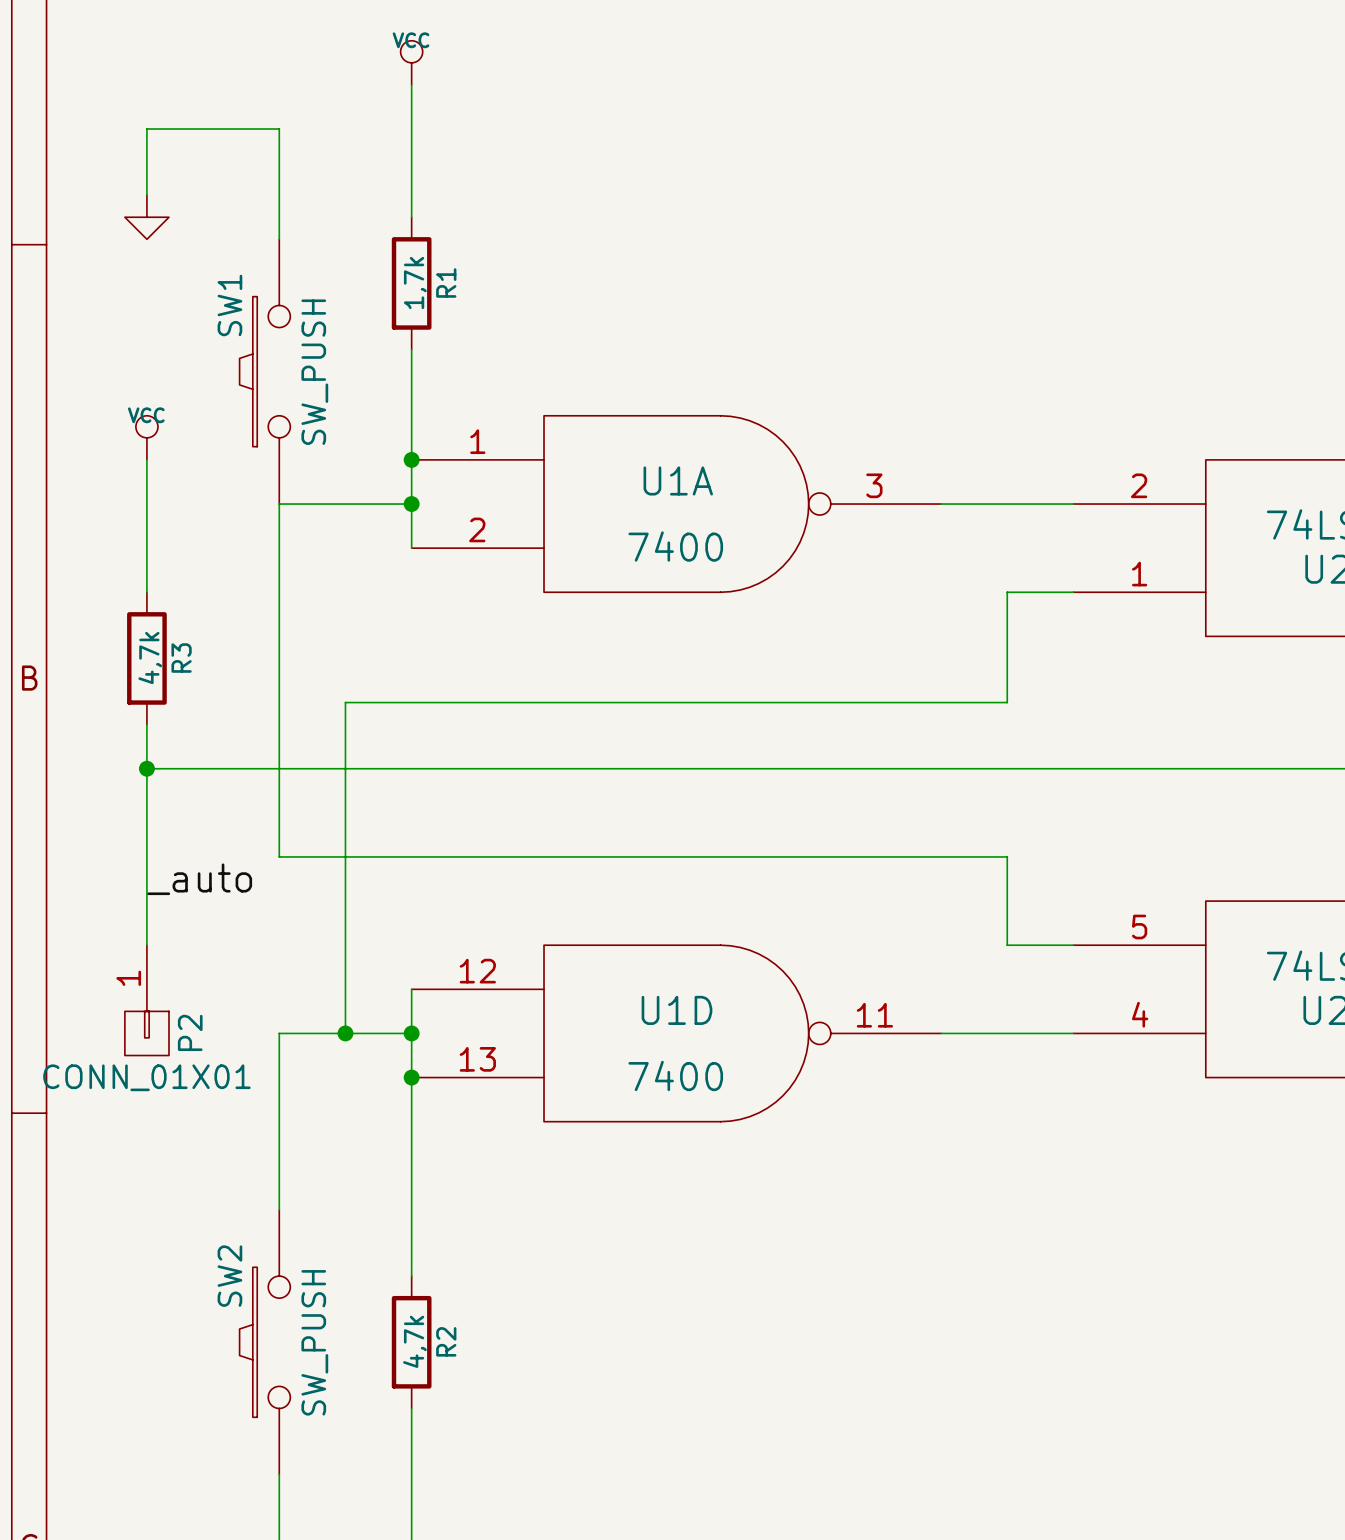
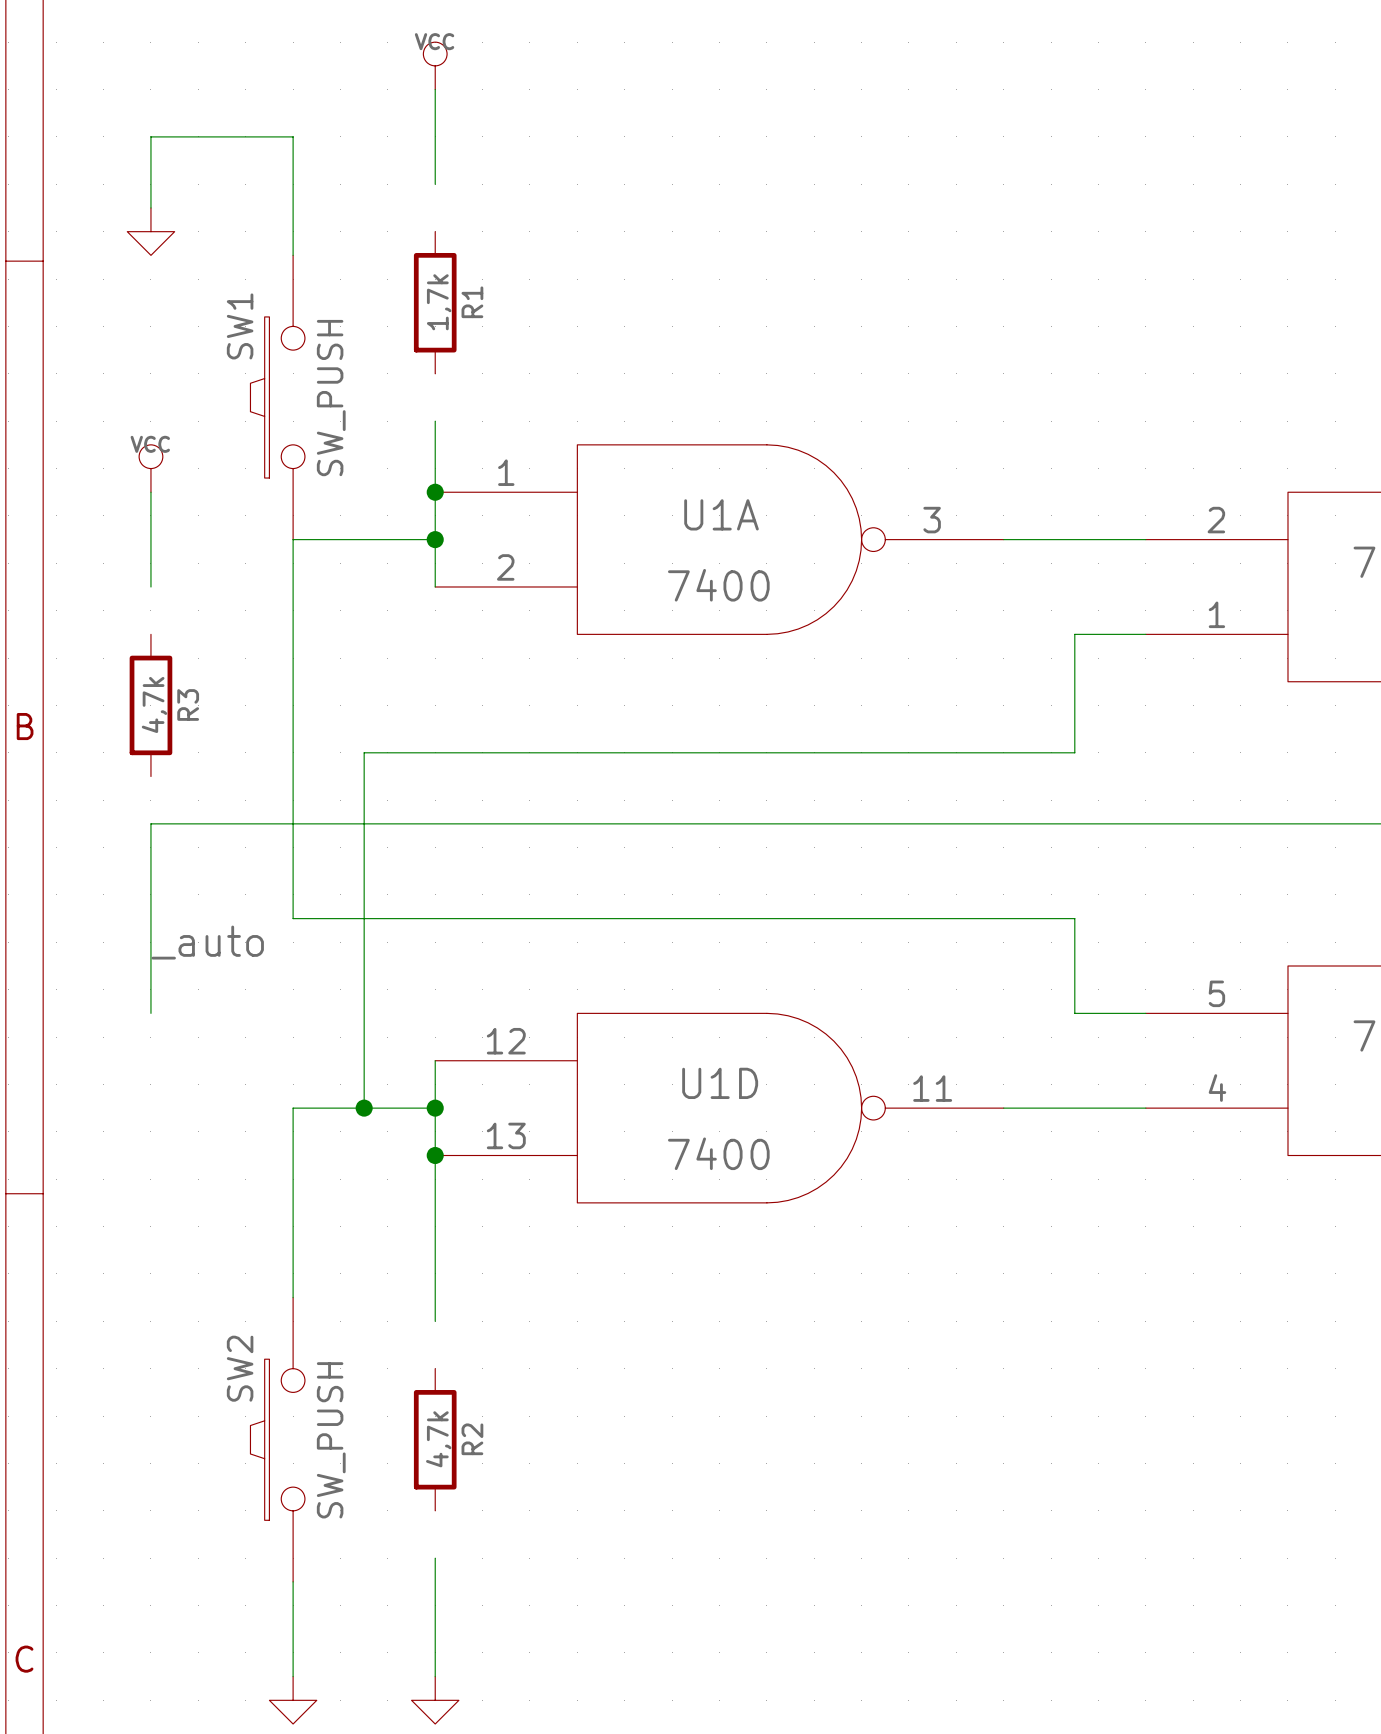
wire: (411, 173) (411, 217) -> none
wire: (411, 349) (411, 393) -> none
wire: (146, 548) (146, 592) -> none
wire: (146, 724) (146, 768) -> none
junction: (146, 768) -> none
P2: CONN_01X01 (146, 1000) -> none
wire: (411, 1231) (411, 1276) -> none
wire: (411, 1408) (411, 1452) -> none

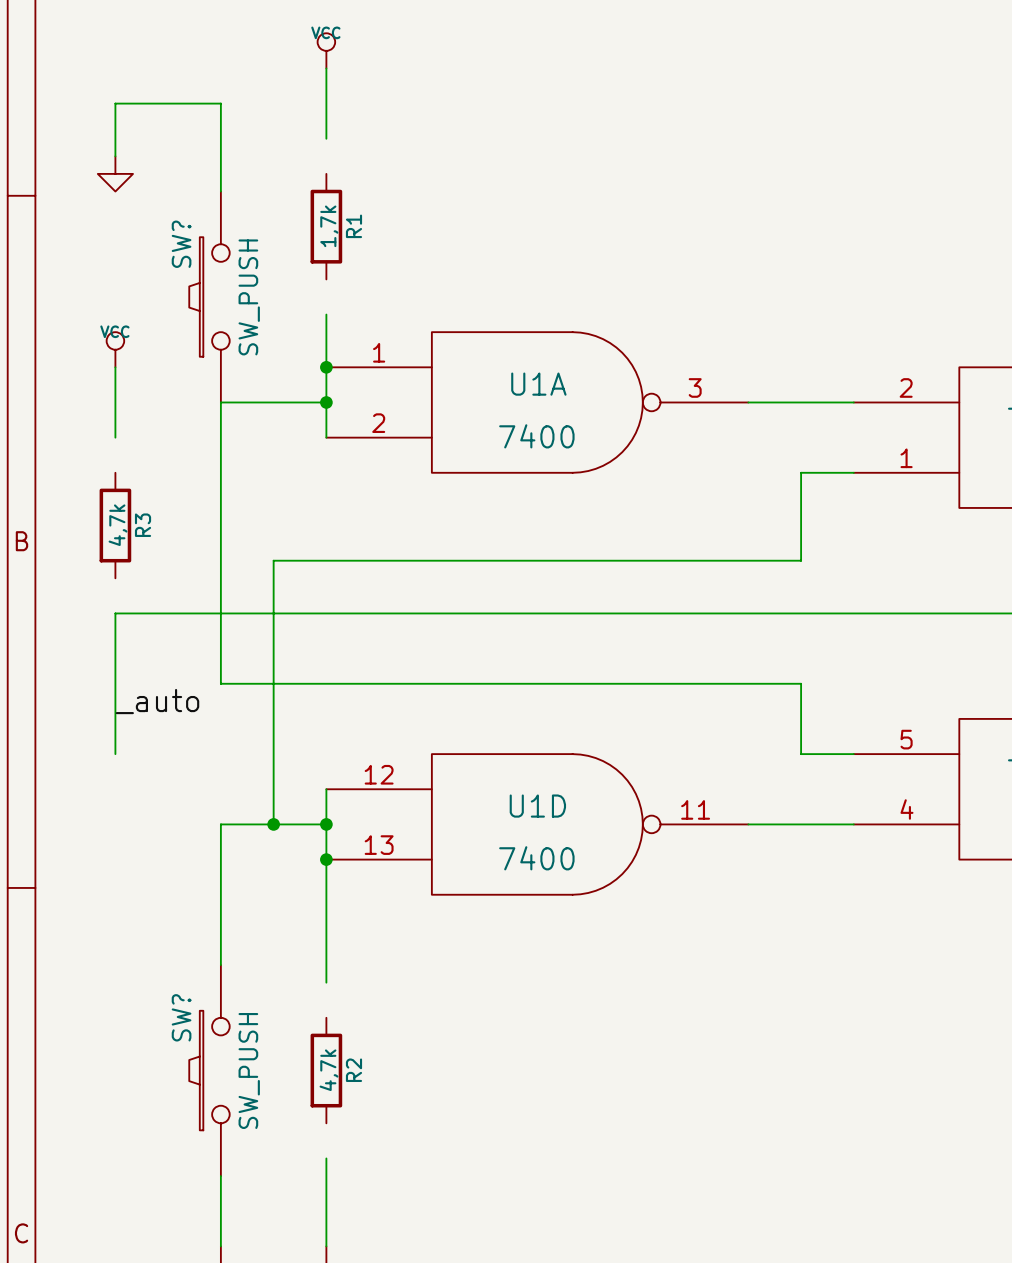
SW1 name: SW1 (240, 326) -> SW? (181, 244)
SW2 name: SW2 (240, 1368) -> SW? (181, 1017)

